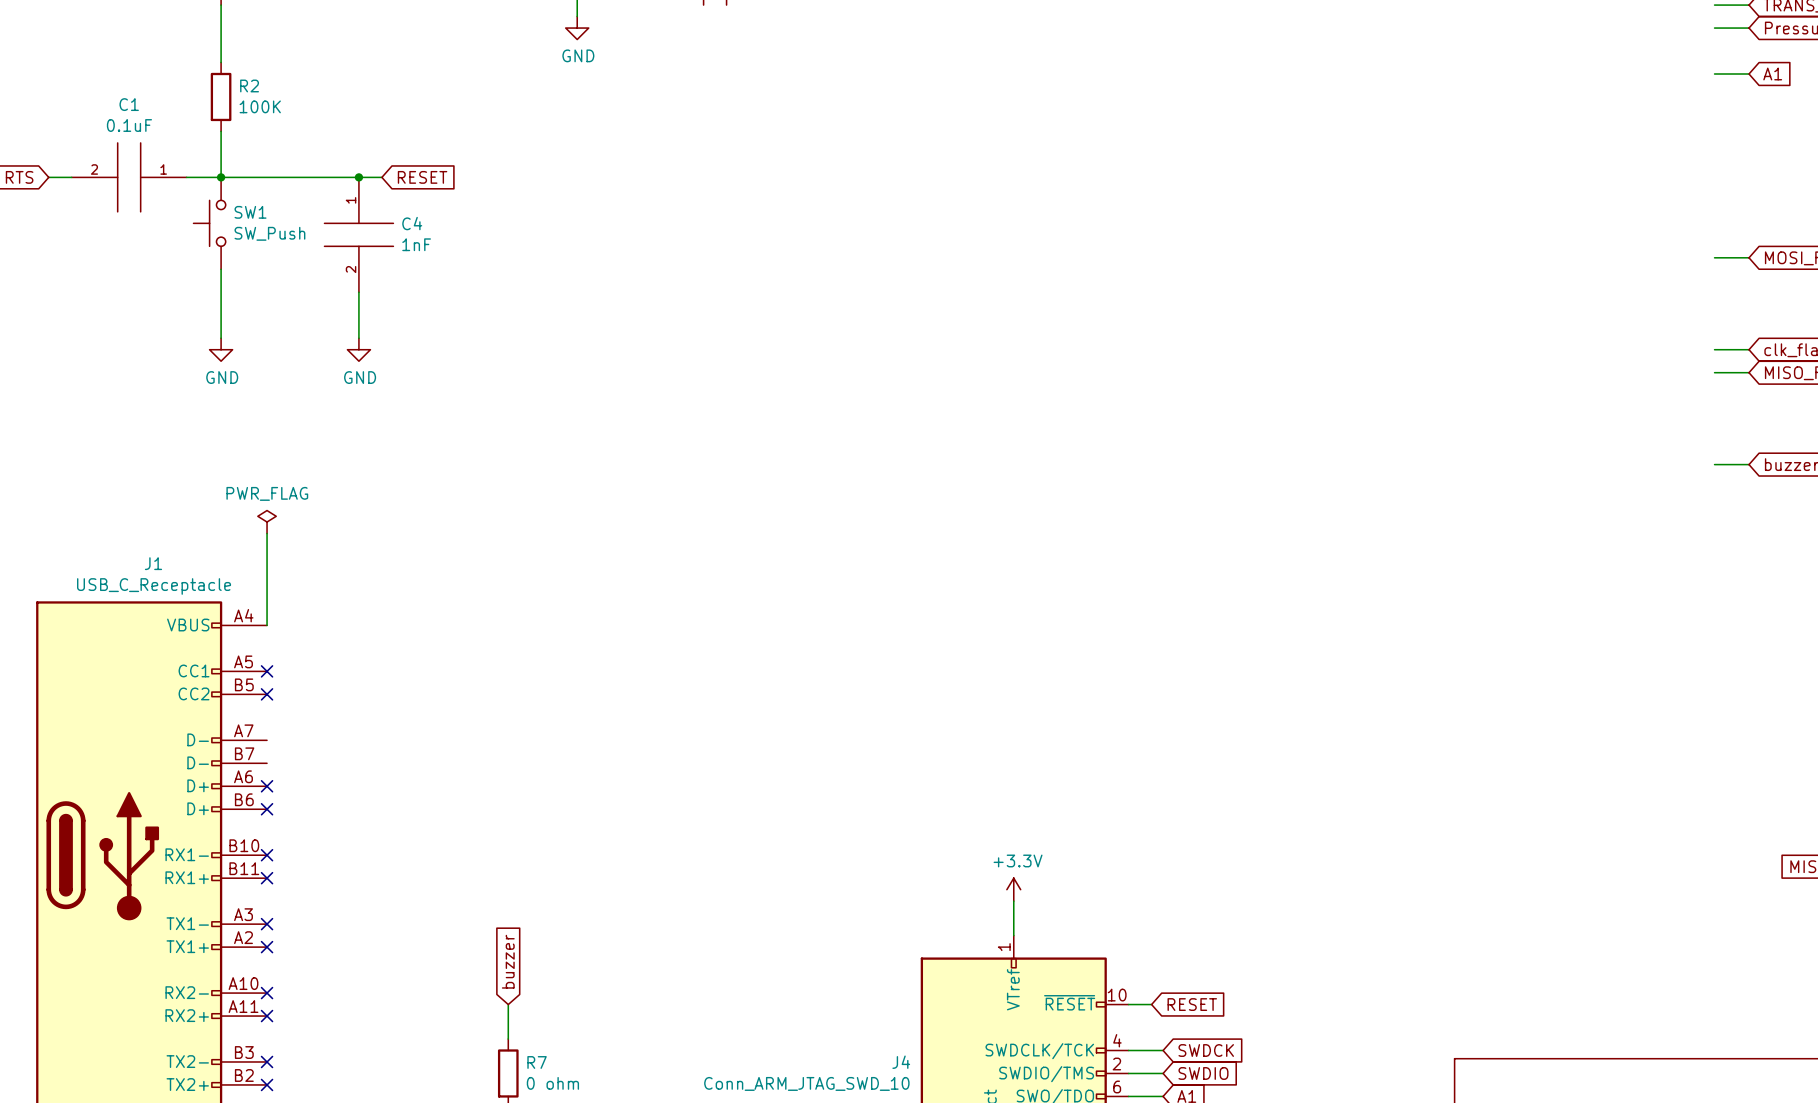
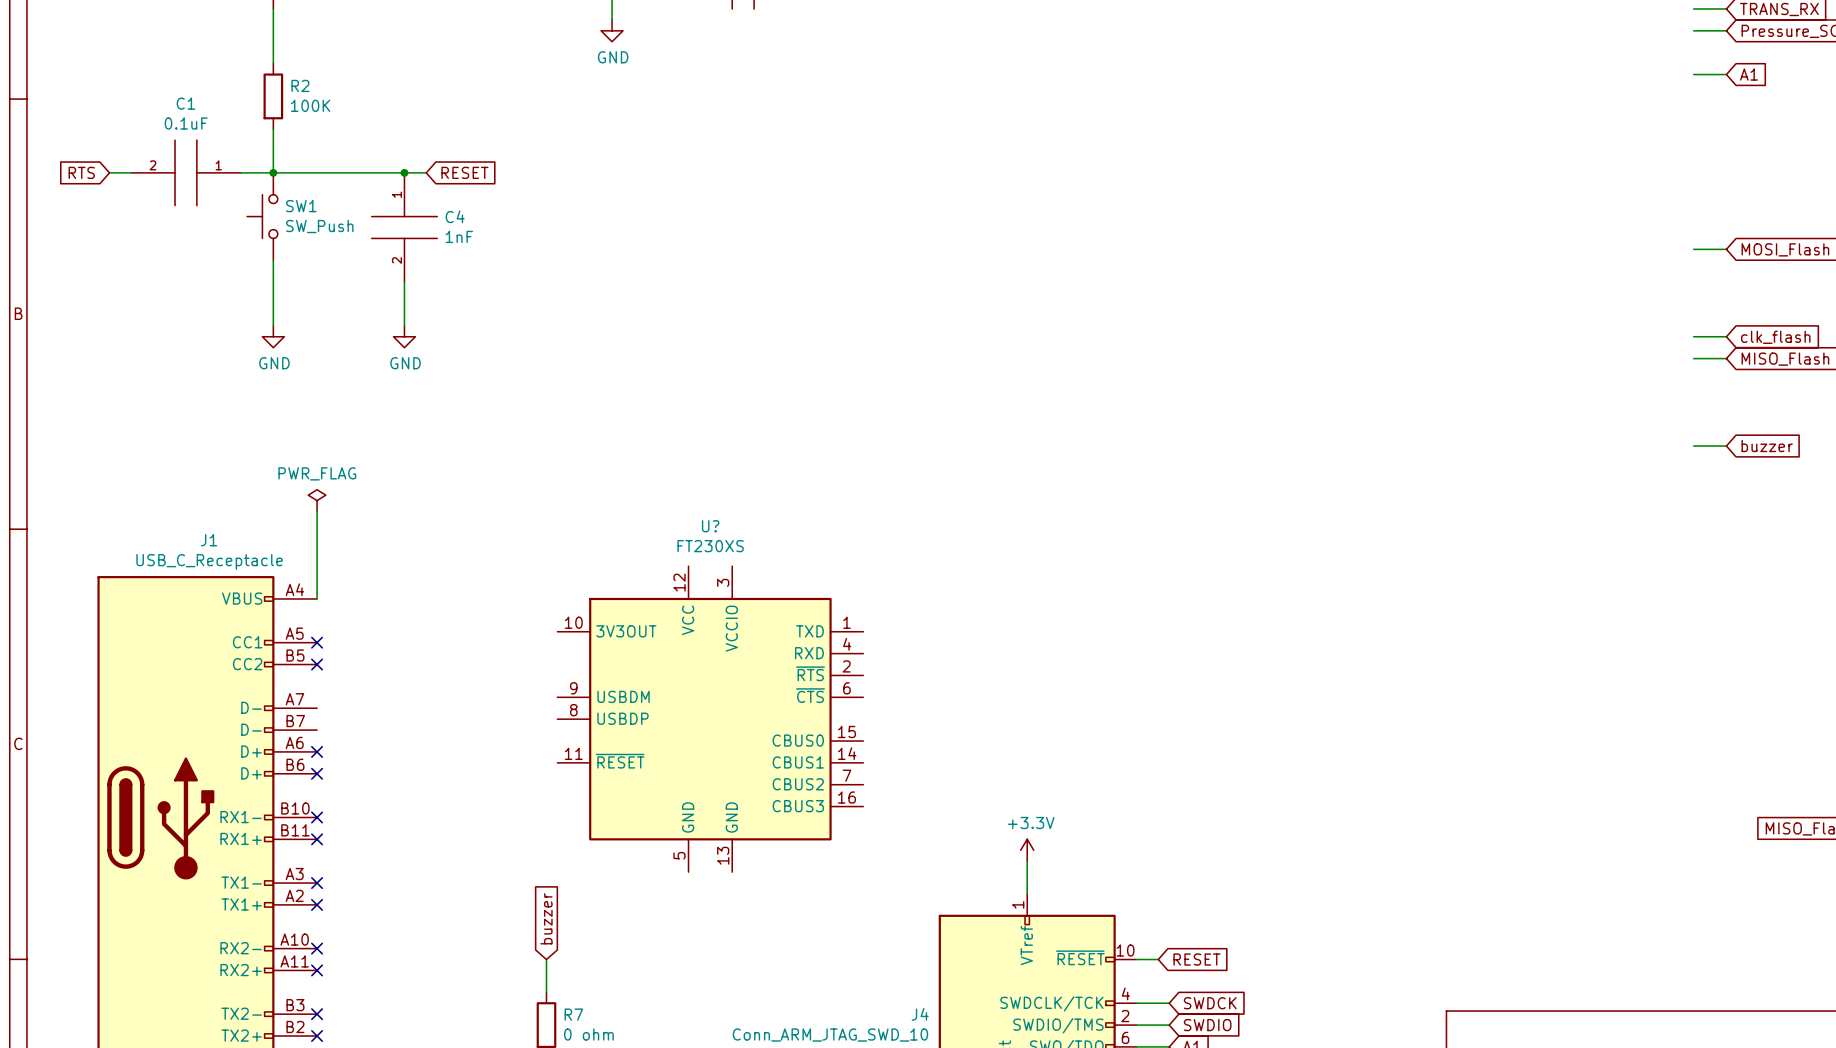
U?: none -> FT230XS (710, 719)

